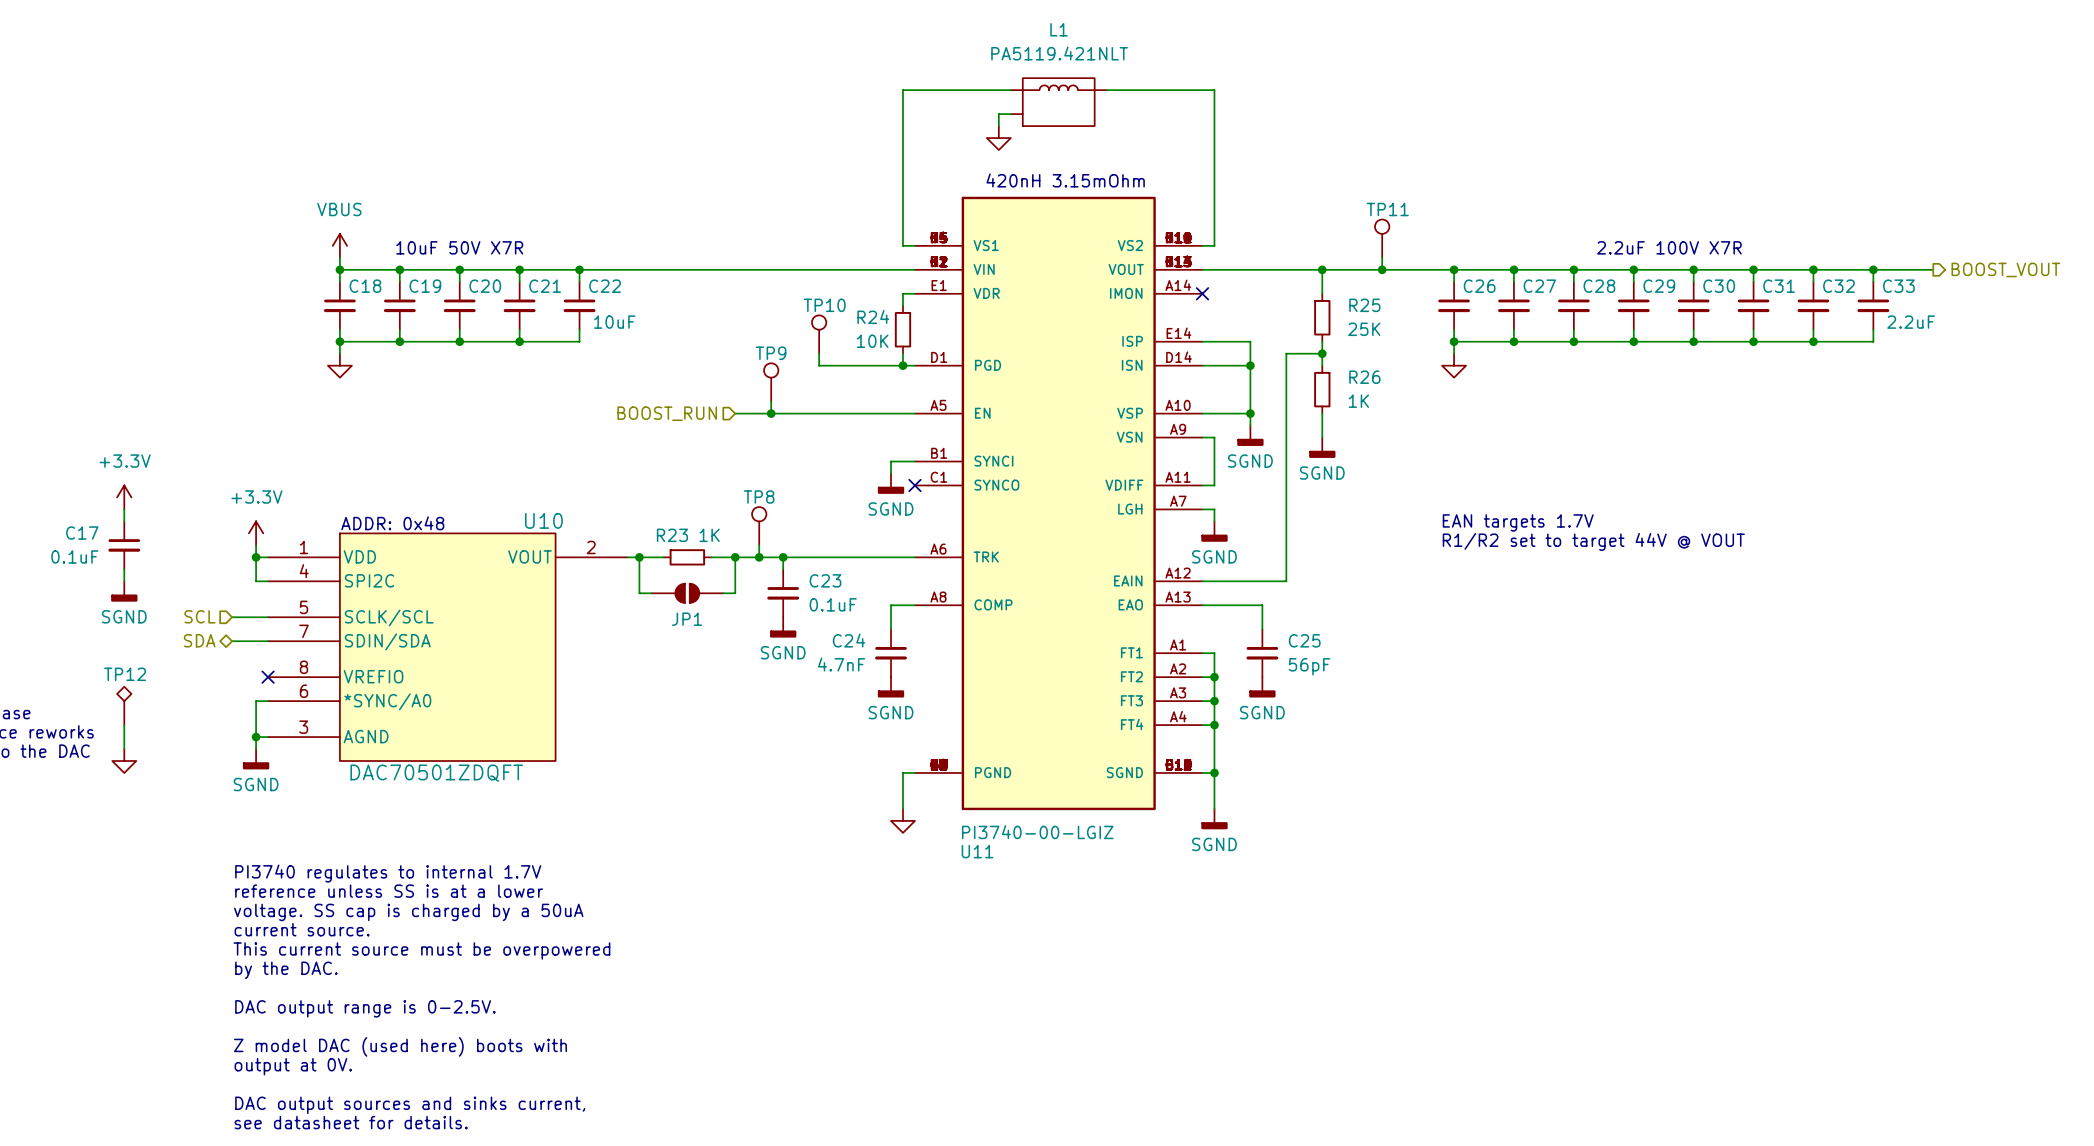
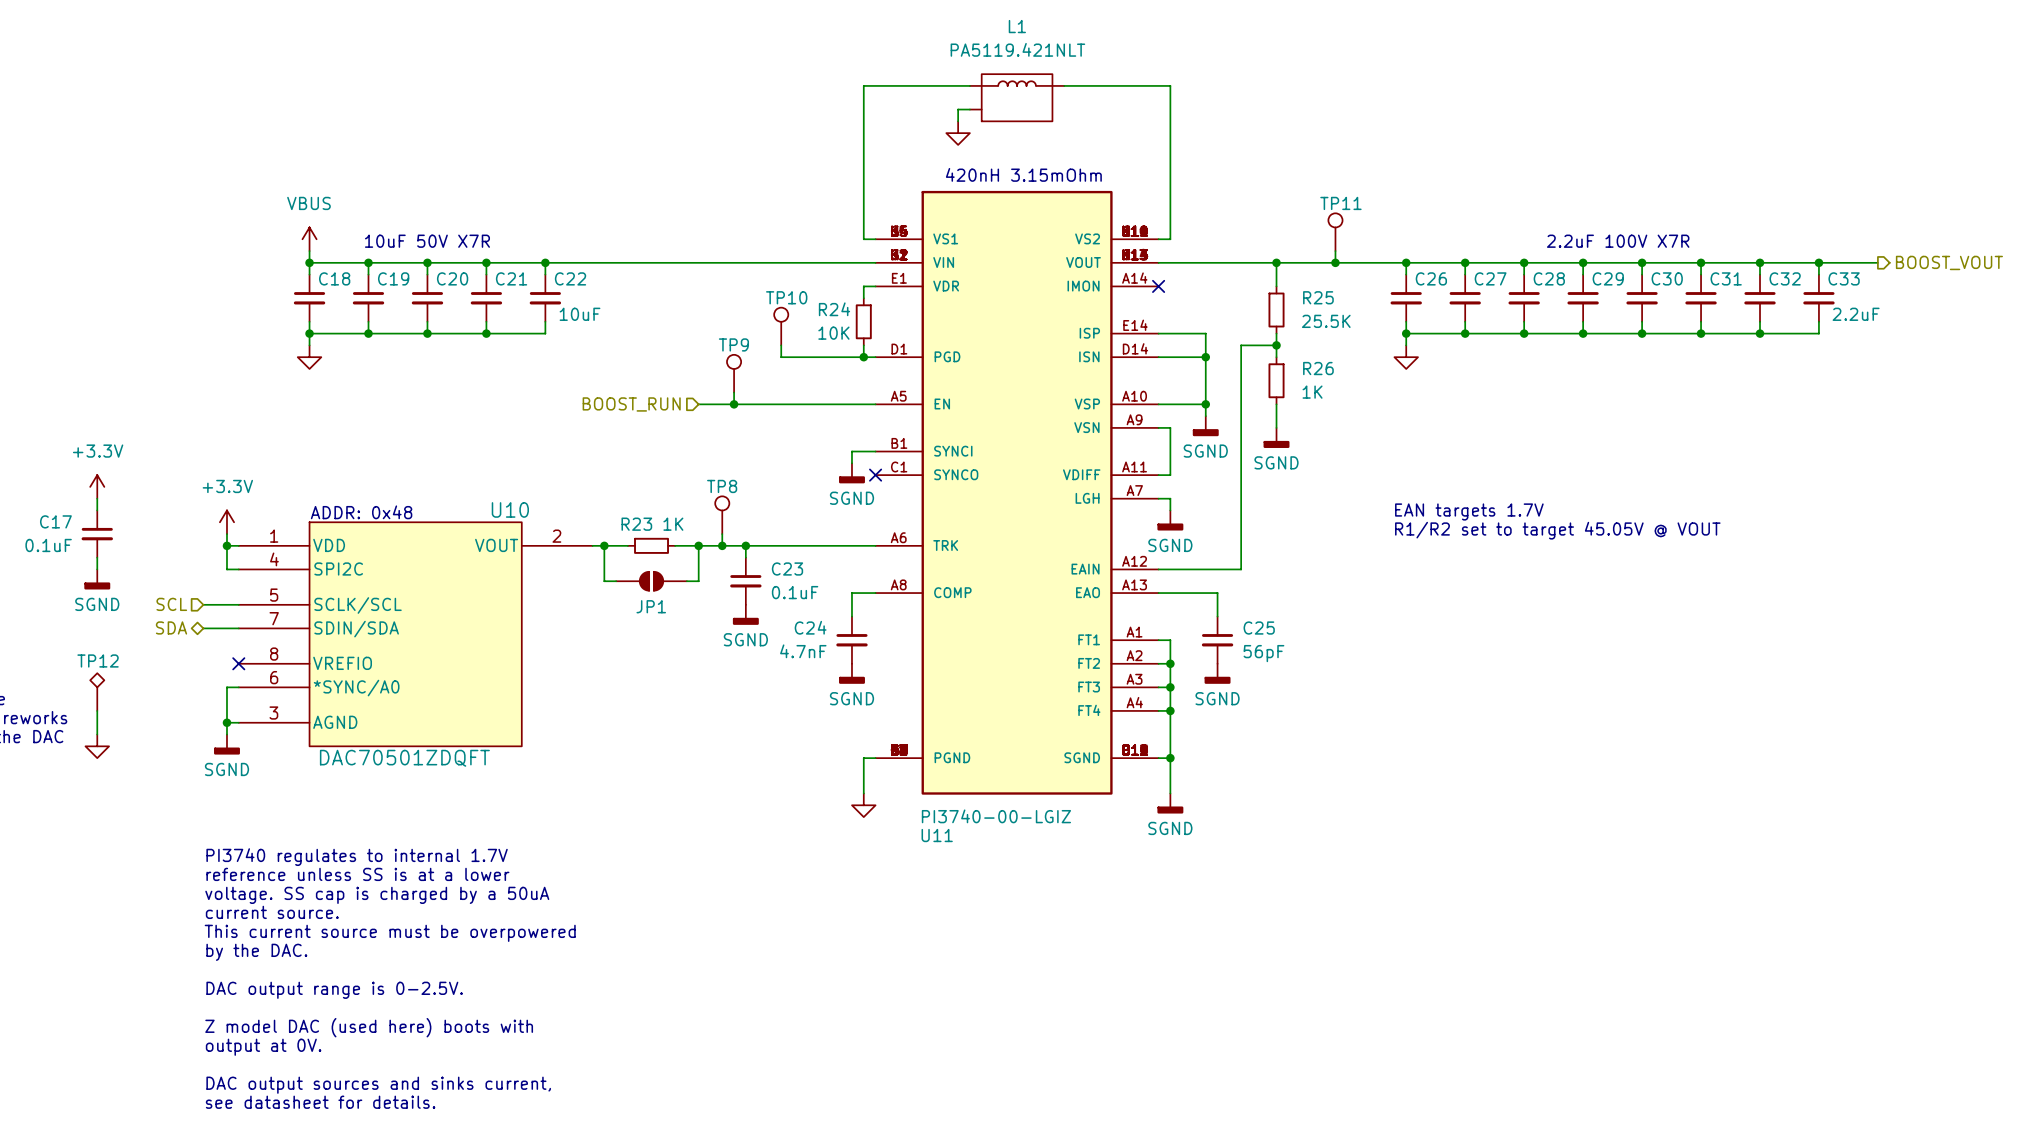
R25 value: 25K (1364, 329) -> 25.5K (1326, 321)
text: R1/R2 set to target 44V @ VOUT (1593, 541) -> R1/R2 set to target 45.05V @ VOUT (1557, 530)

